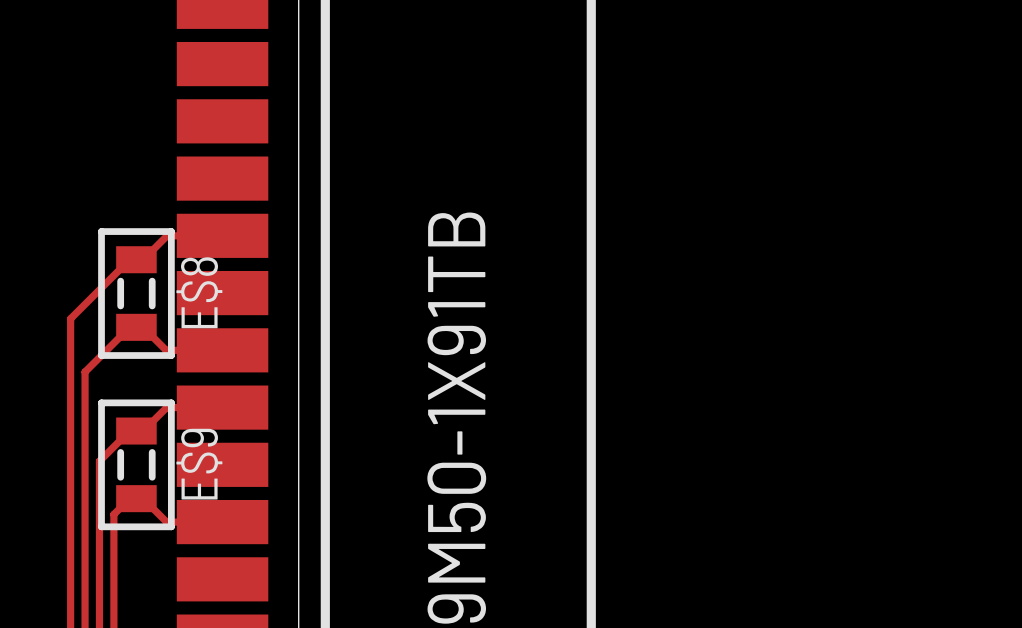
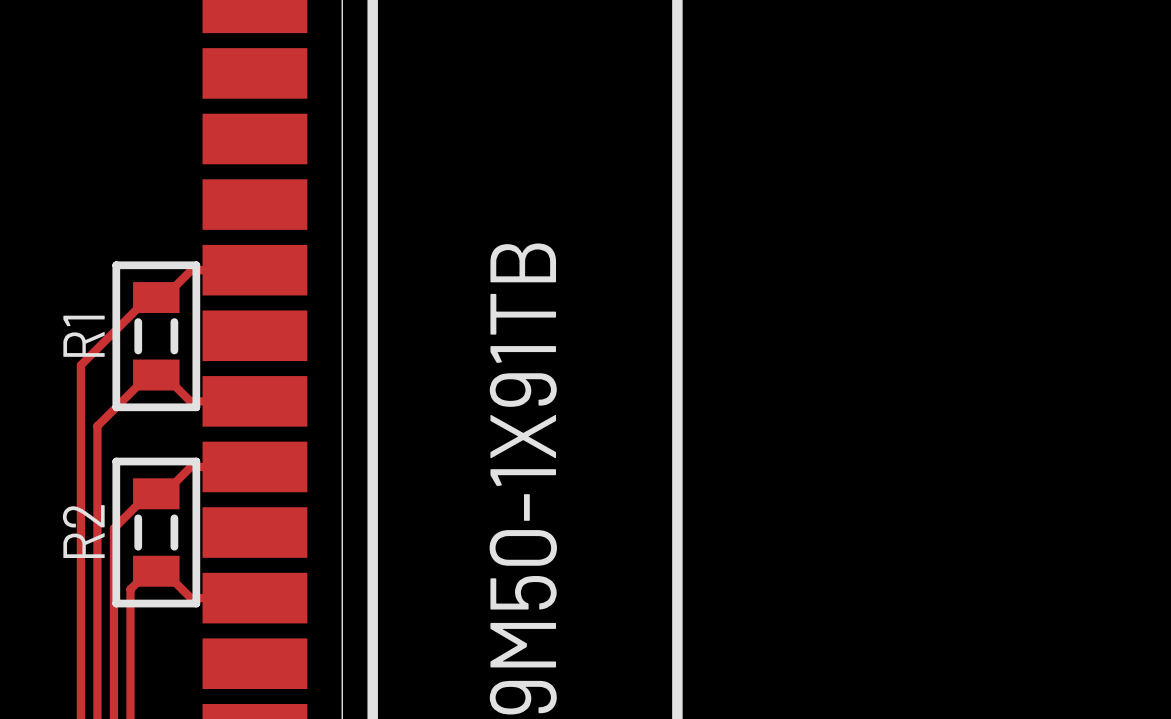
E$8 name: E$8 (199, 292) -> R1 (84, 336)
E$9 name: E$9 (199, 464) -> R2 (83, 531)

